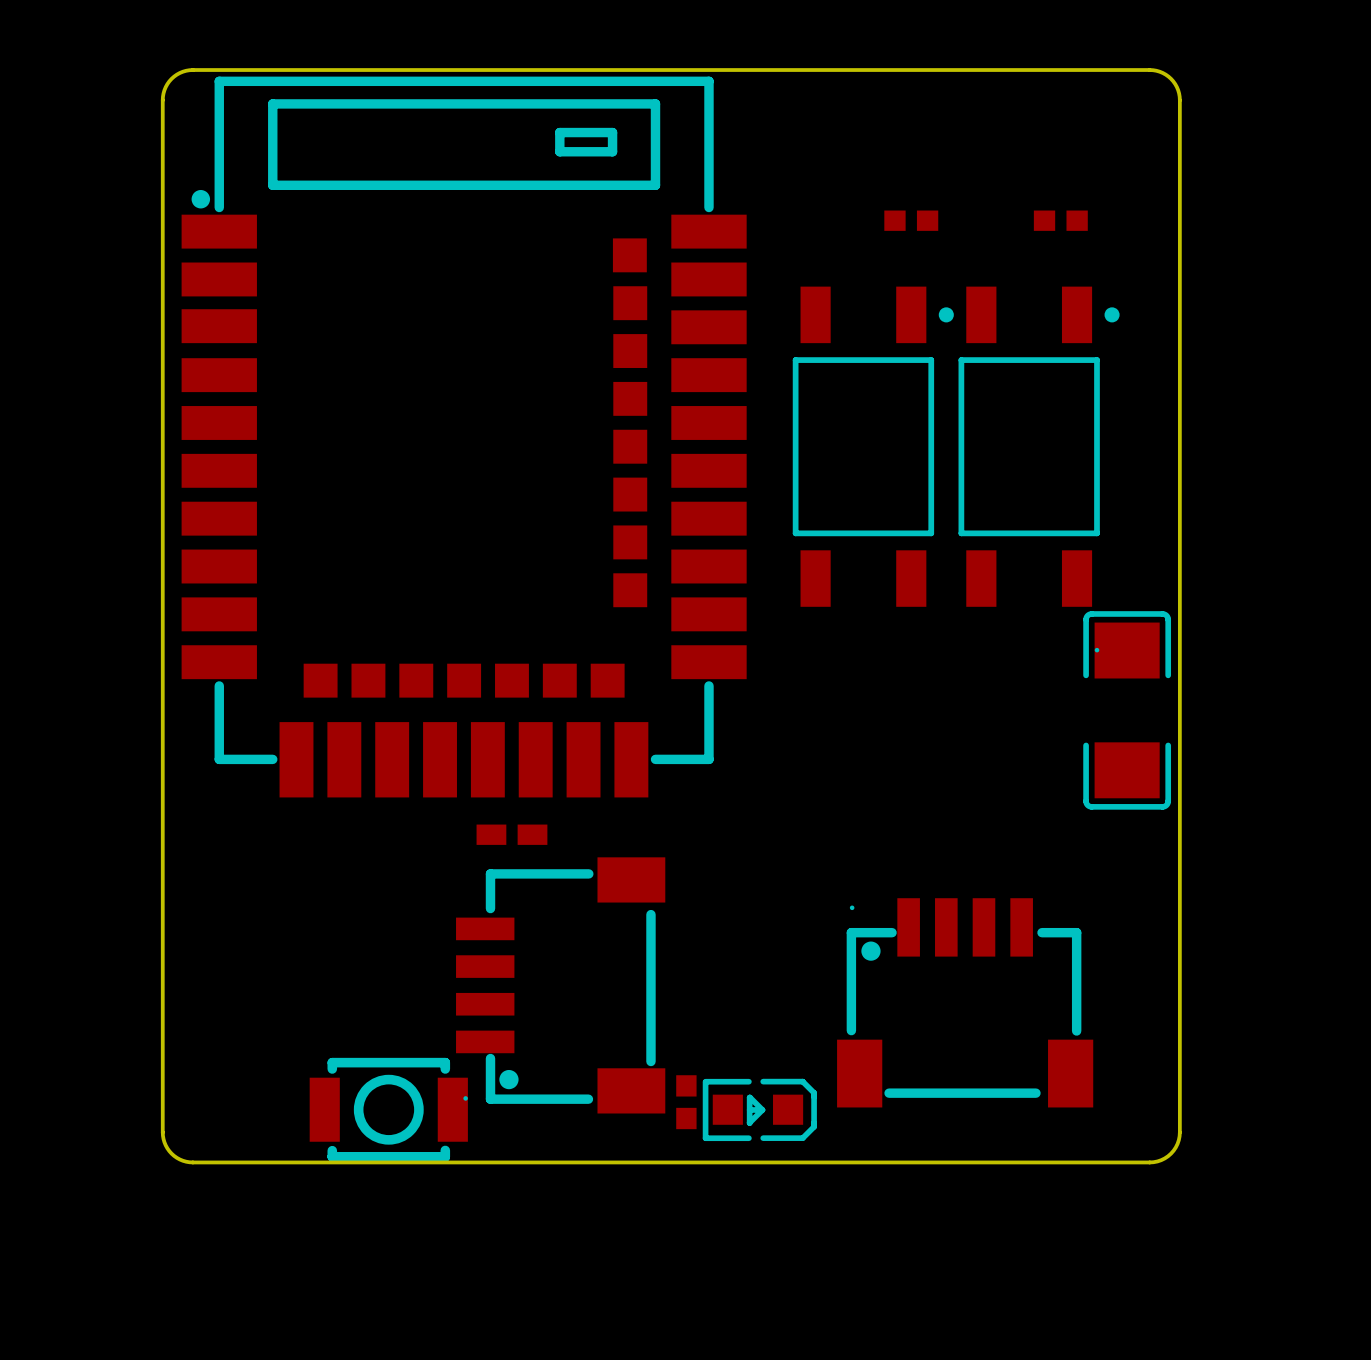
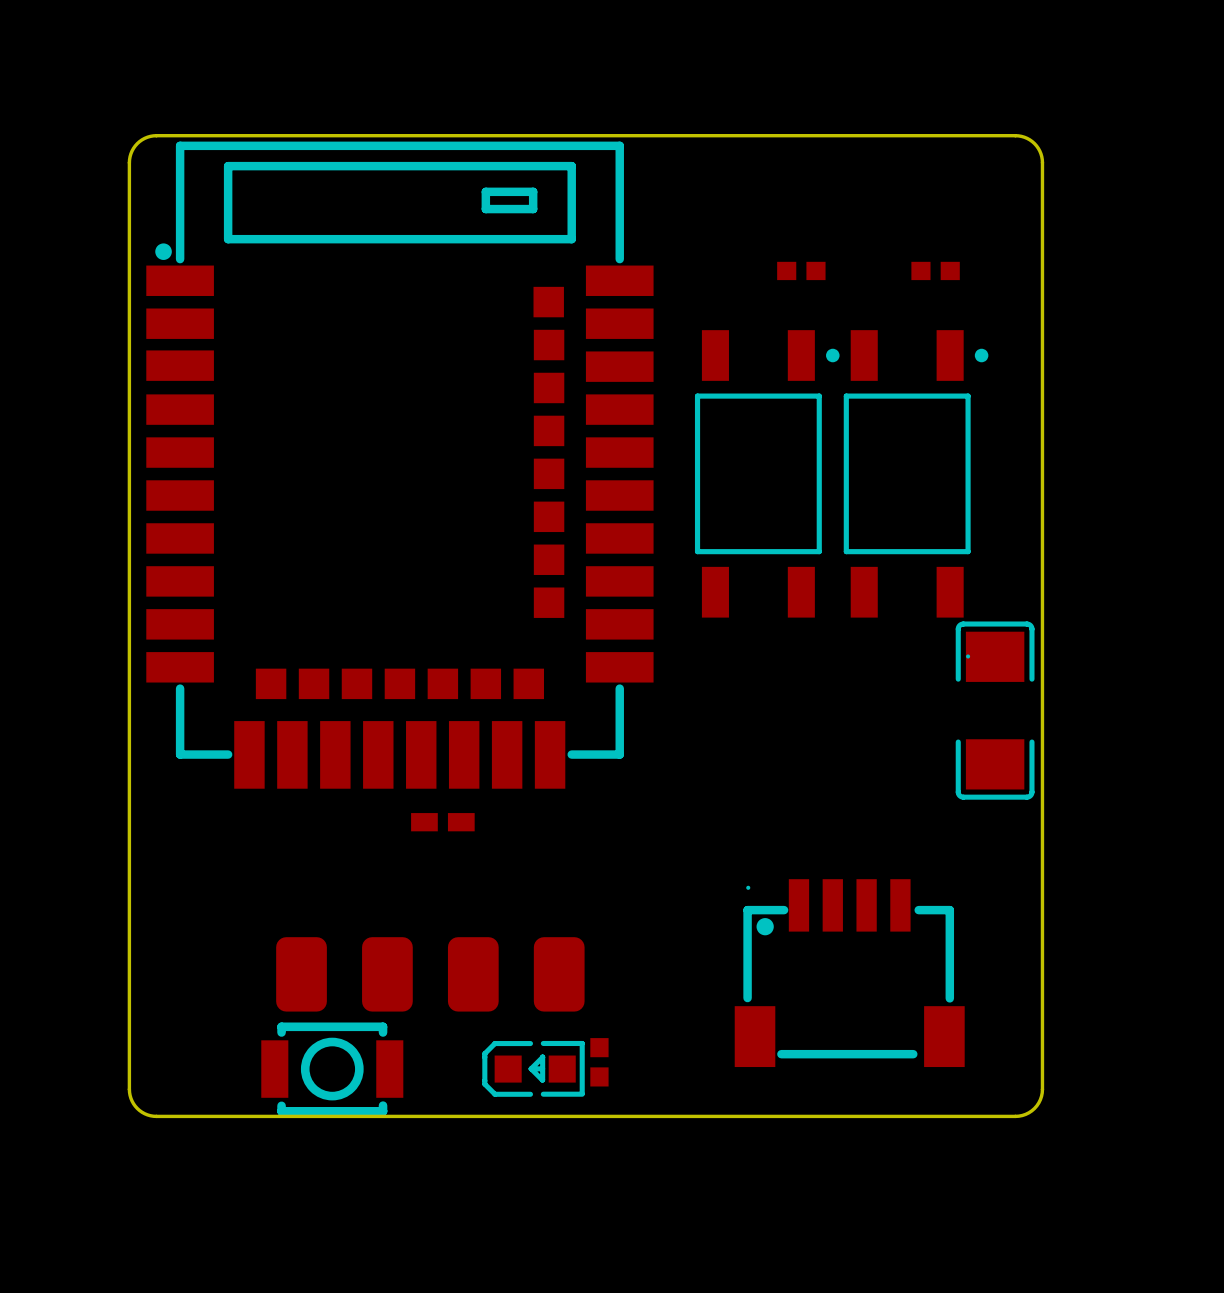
part: (560, 985) -> none
part: none -> (430, 974)
part rotation: 0° (759, 1109) -> 180° (533, 1068)
part position: (759, 1109) -> (533, 1068)

